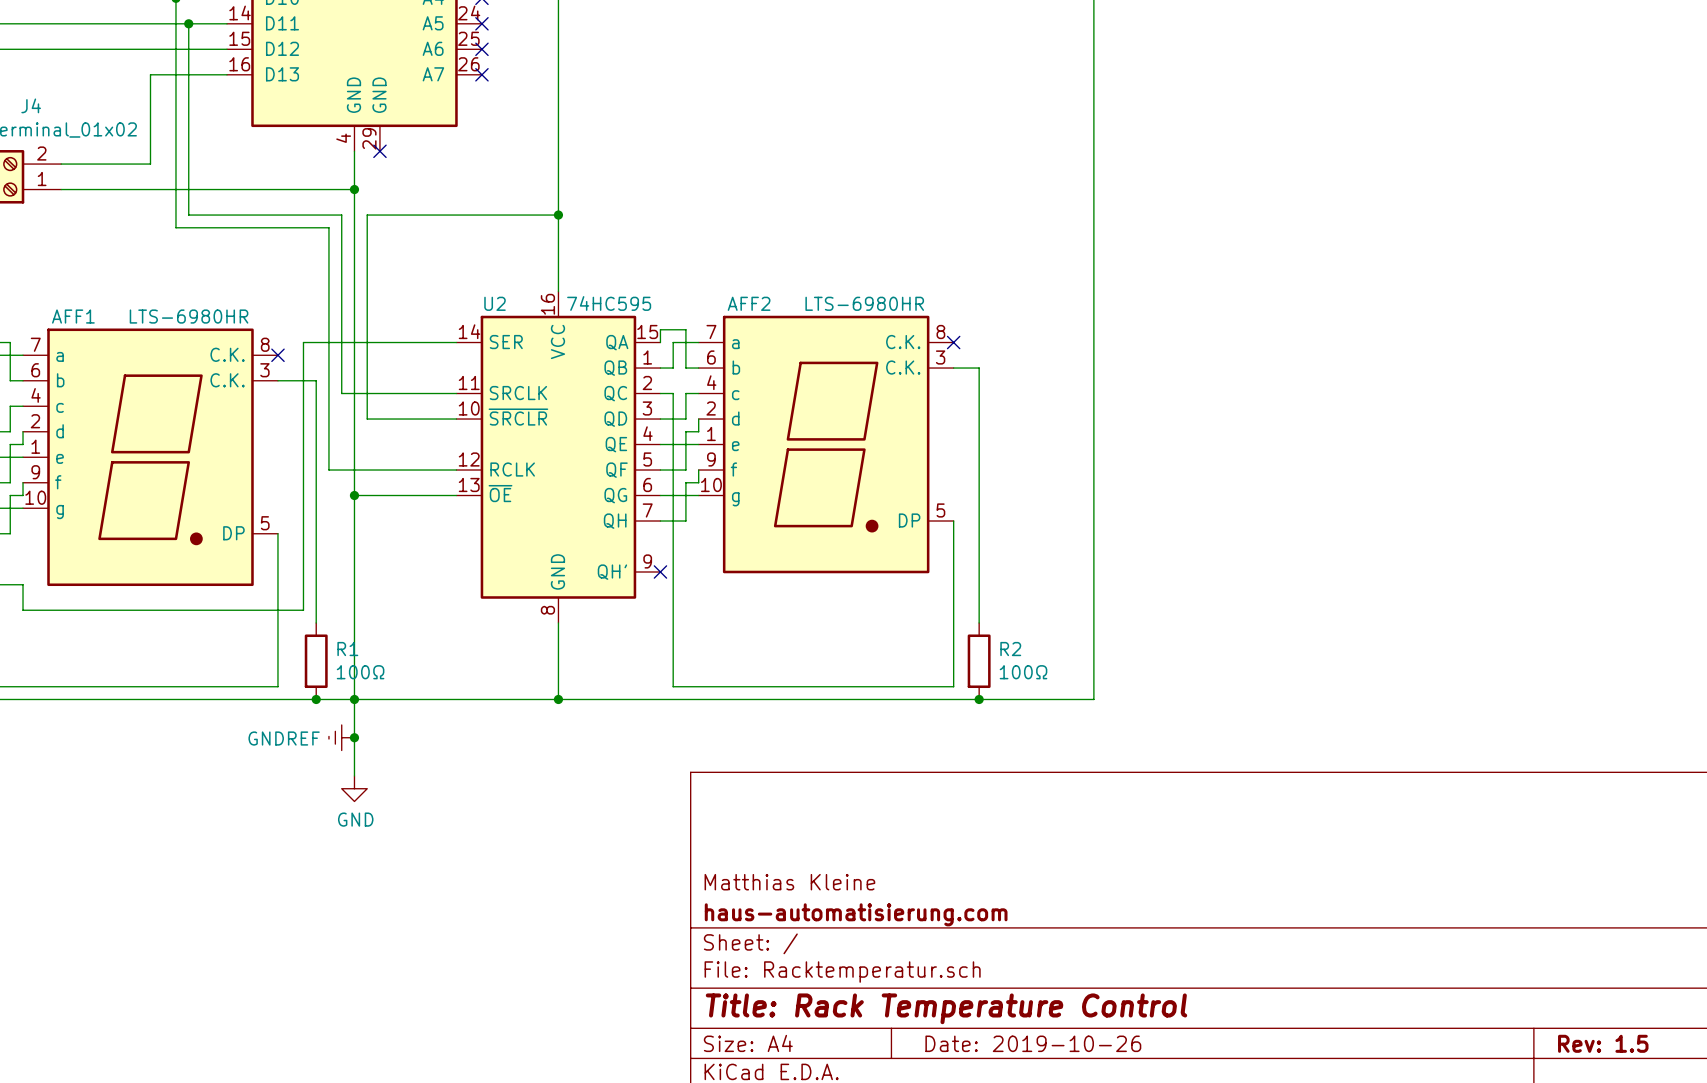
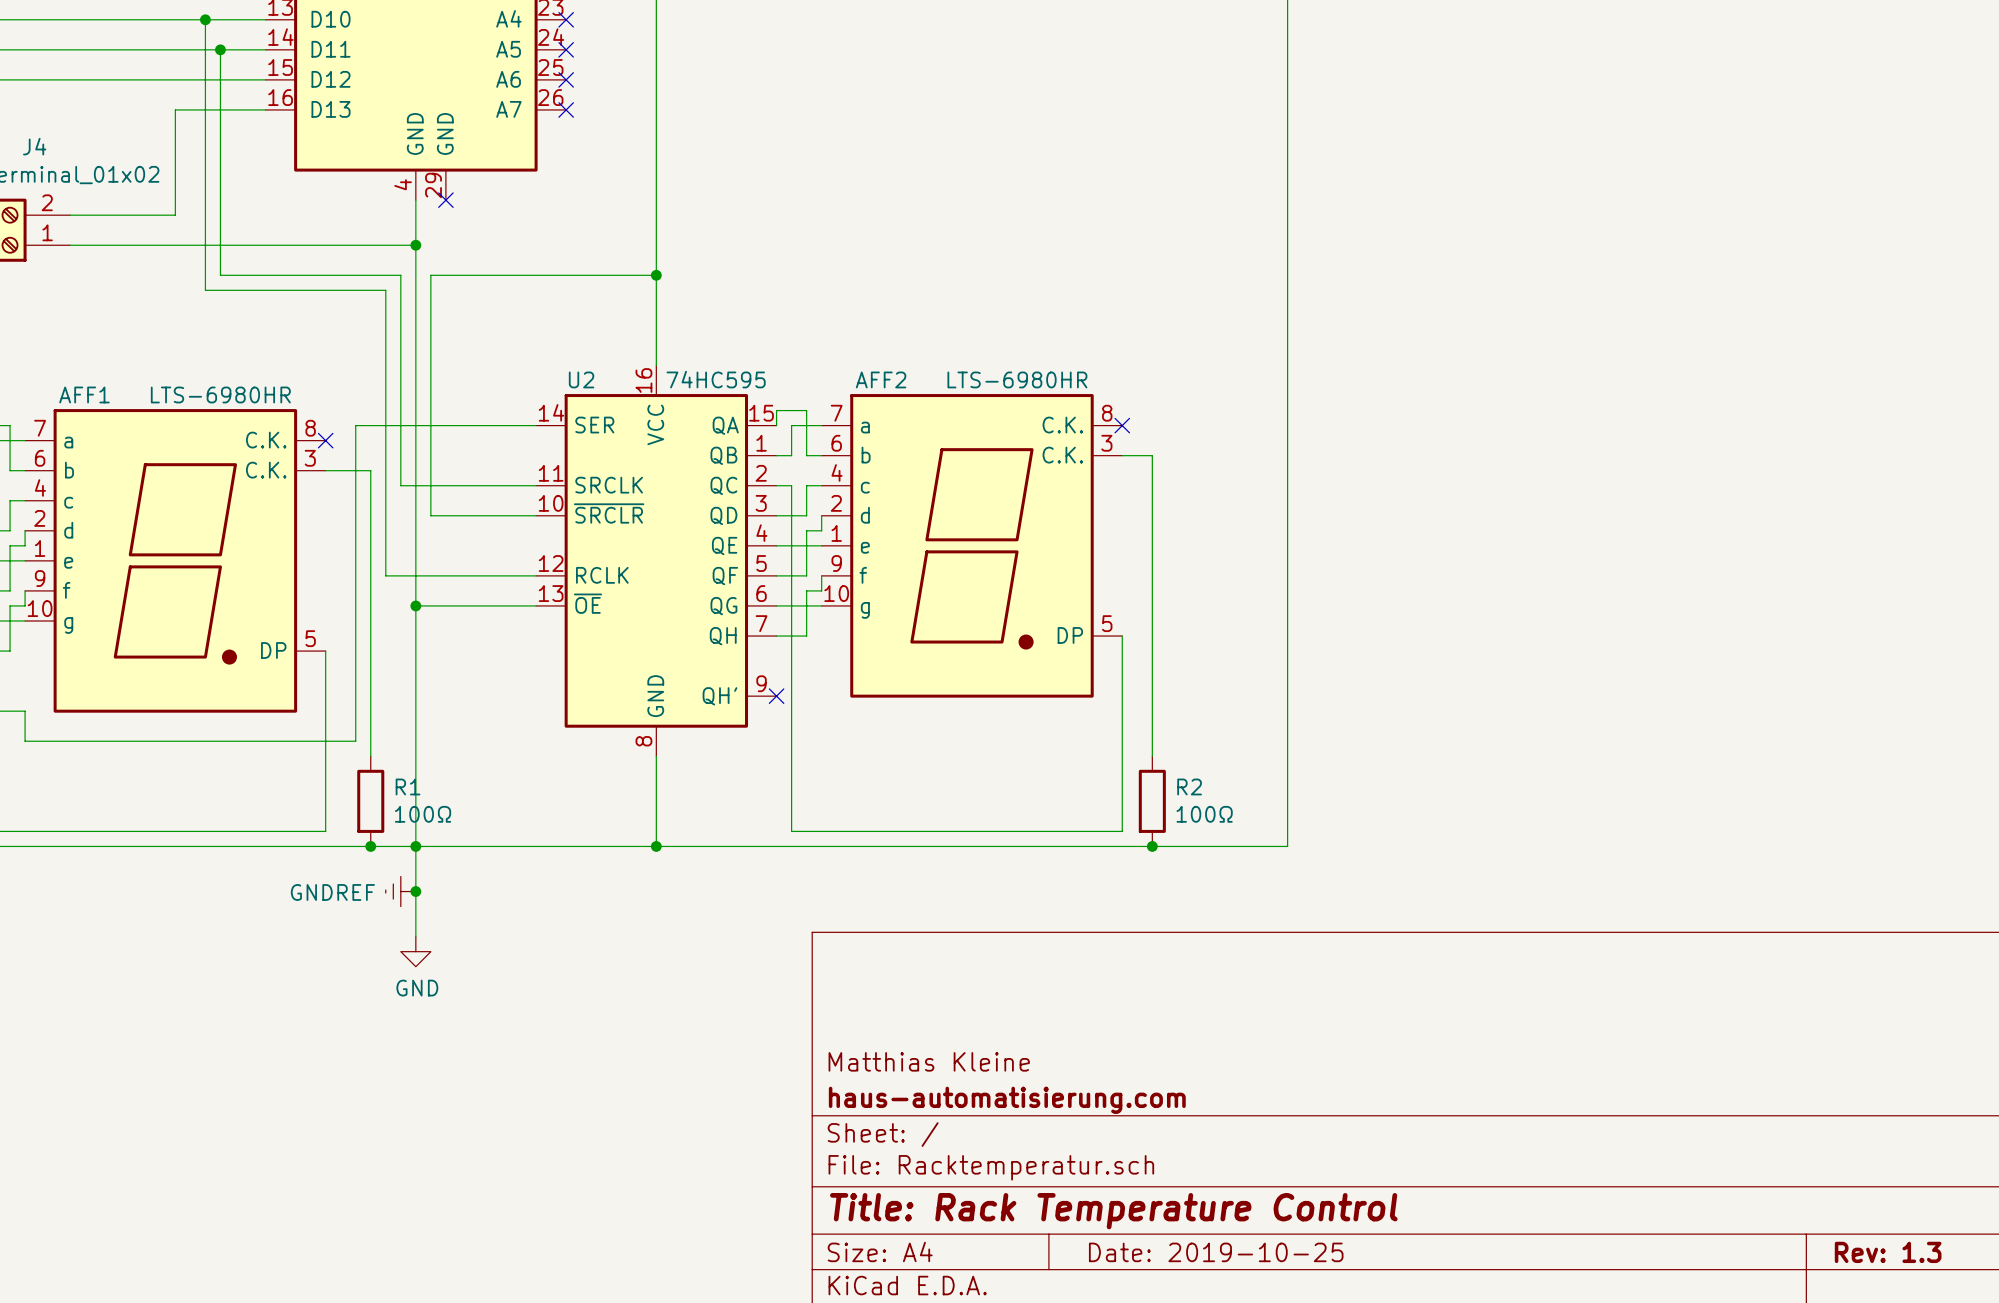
title block: Date: 2019-10-26 (1033, 1043) -> Date: 2019-10-25 (1216, 1252)
title block: Rev: 1.5 (1603, 1043) -> Rev: 1.3 (1888, 1252)

